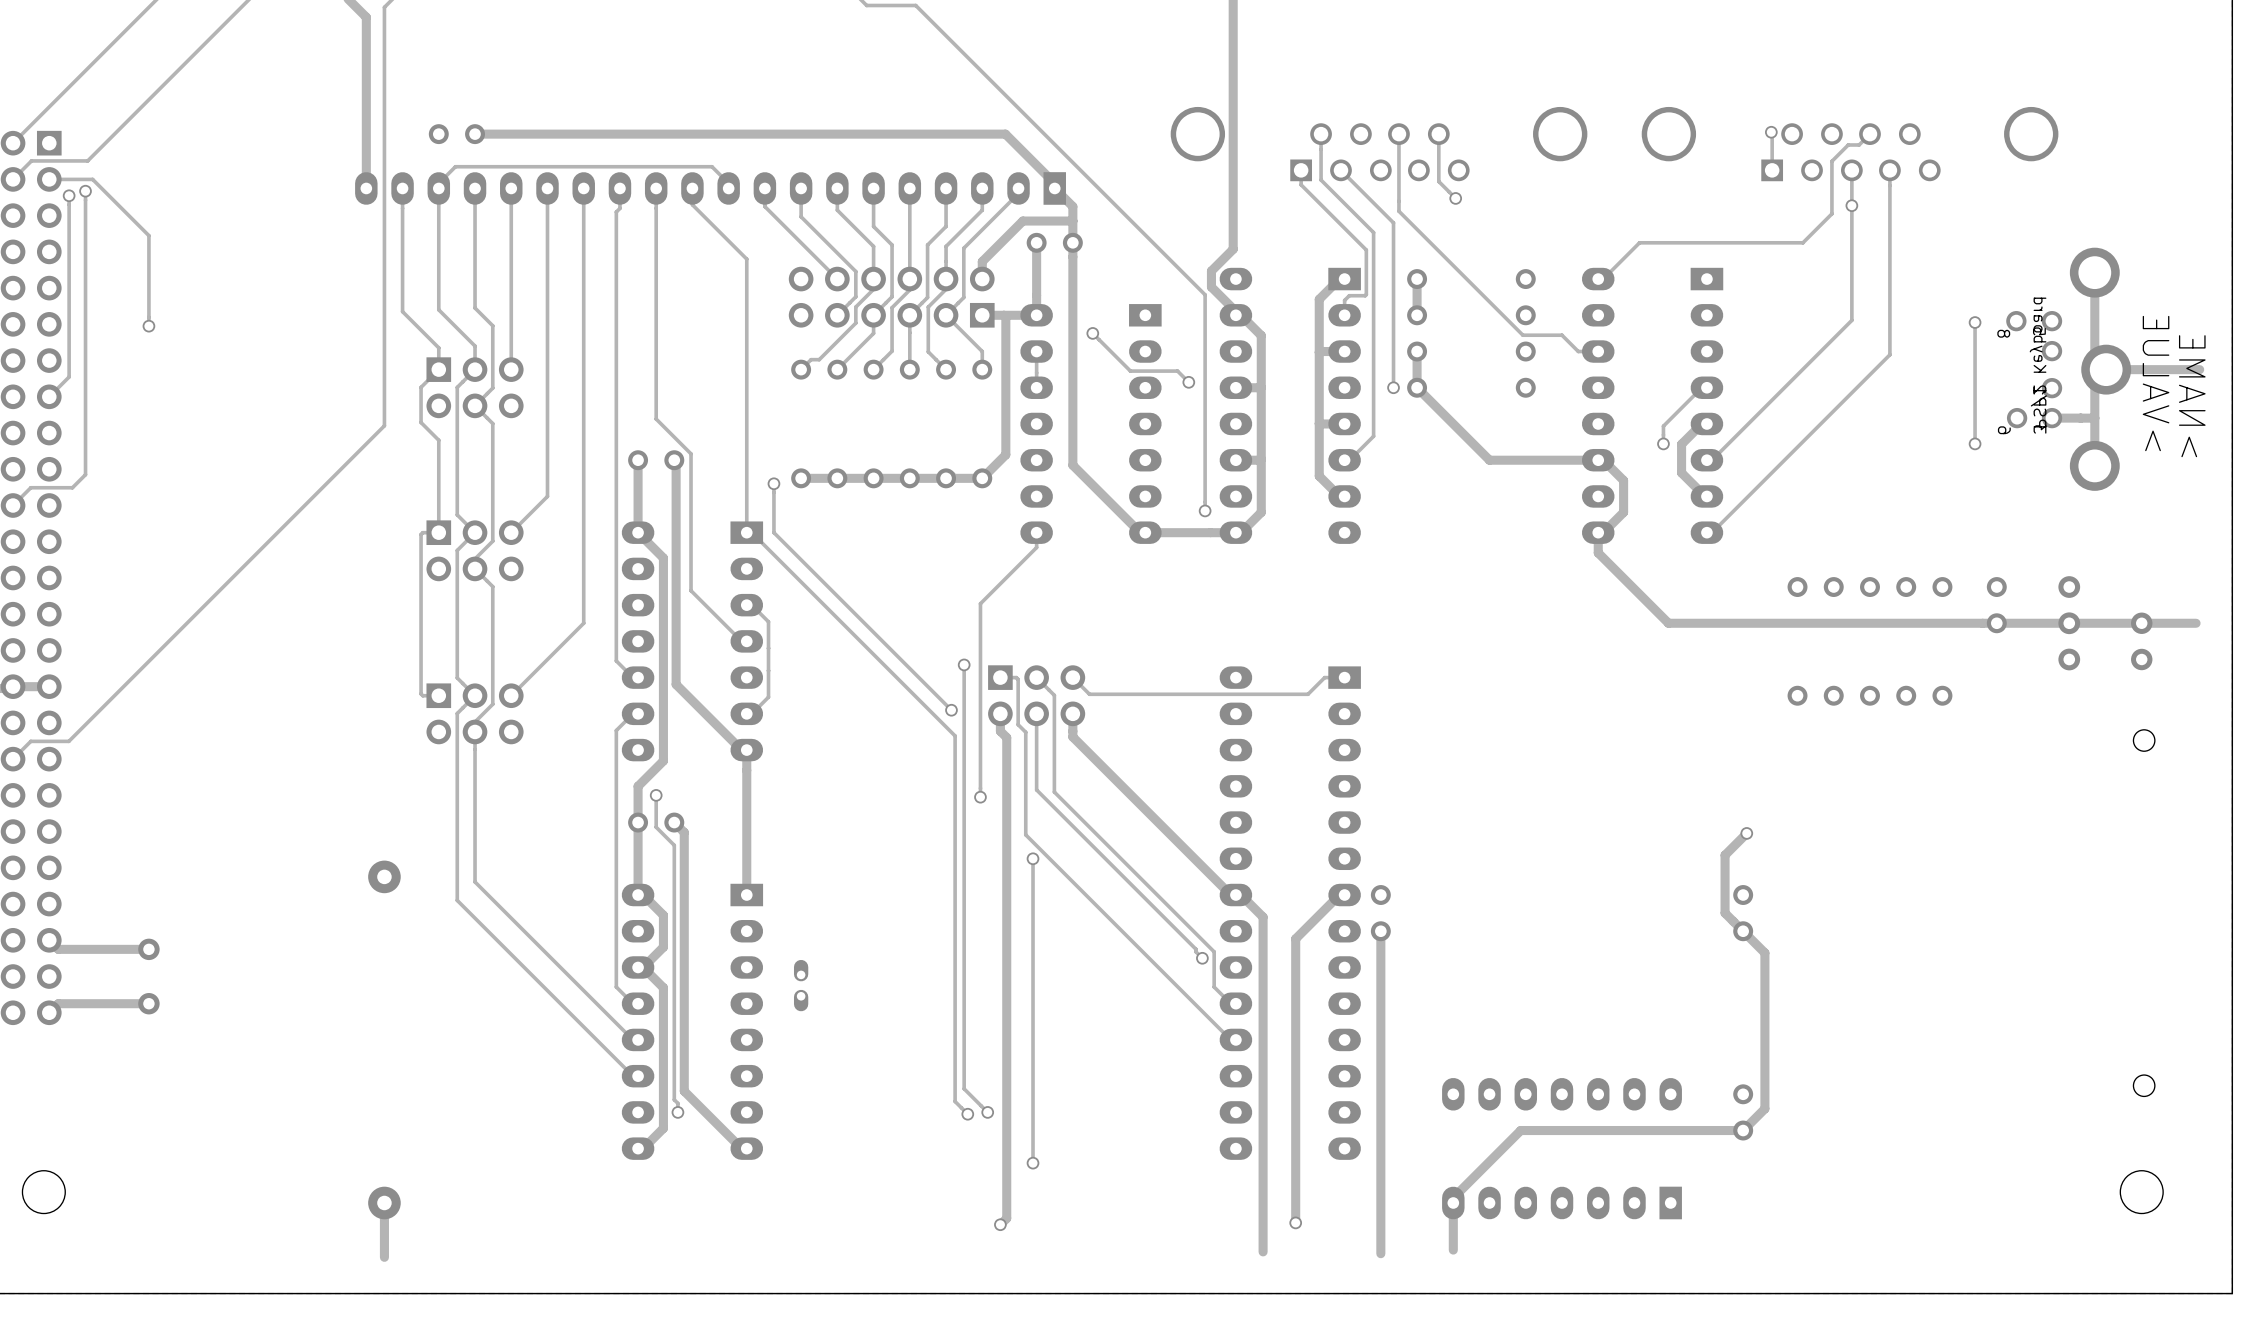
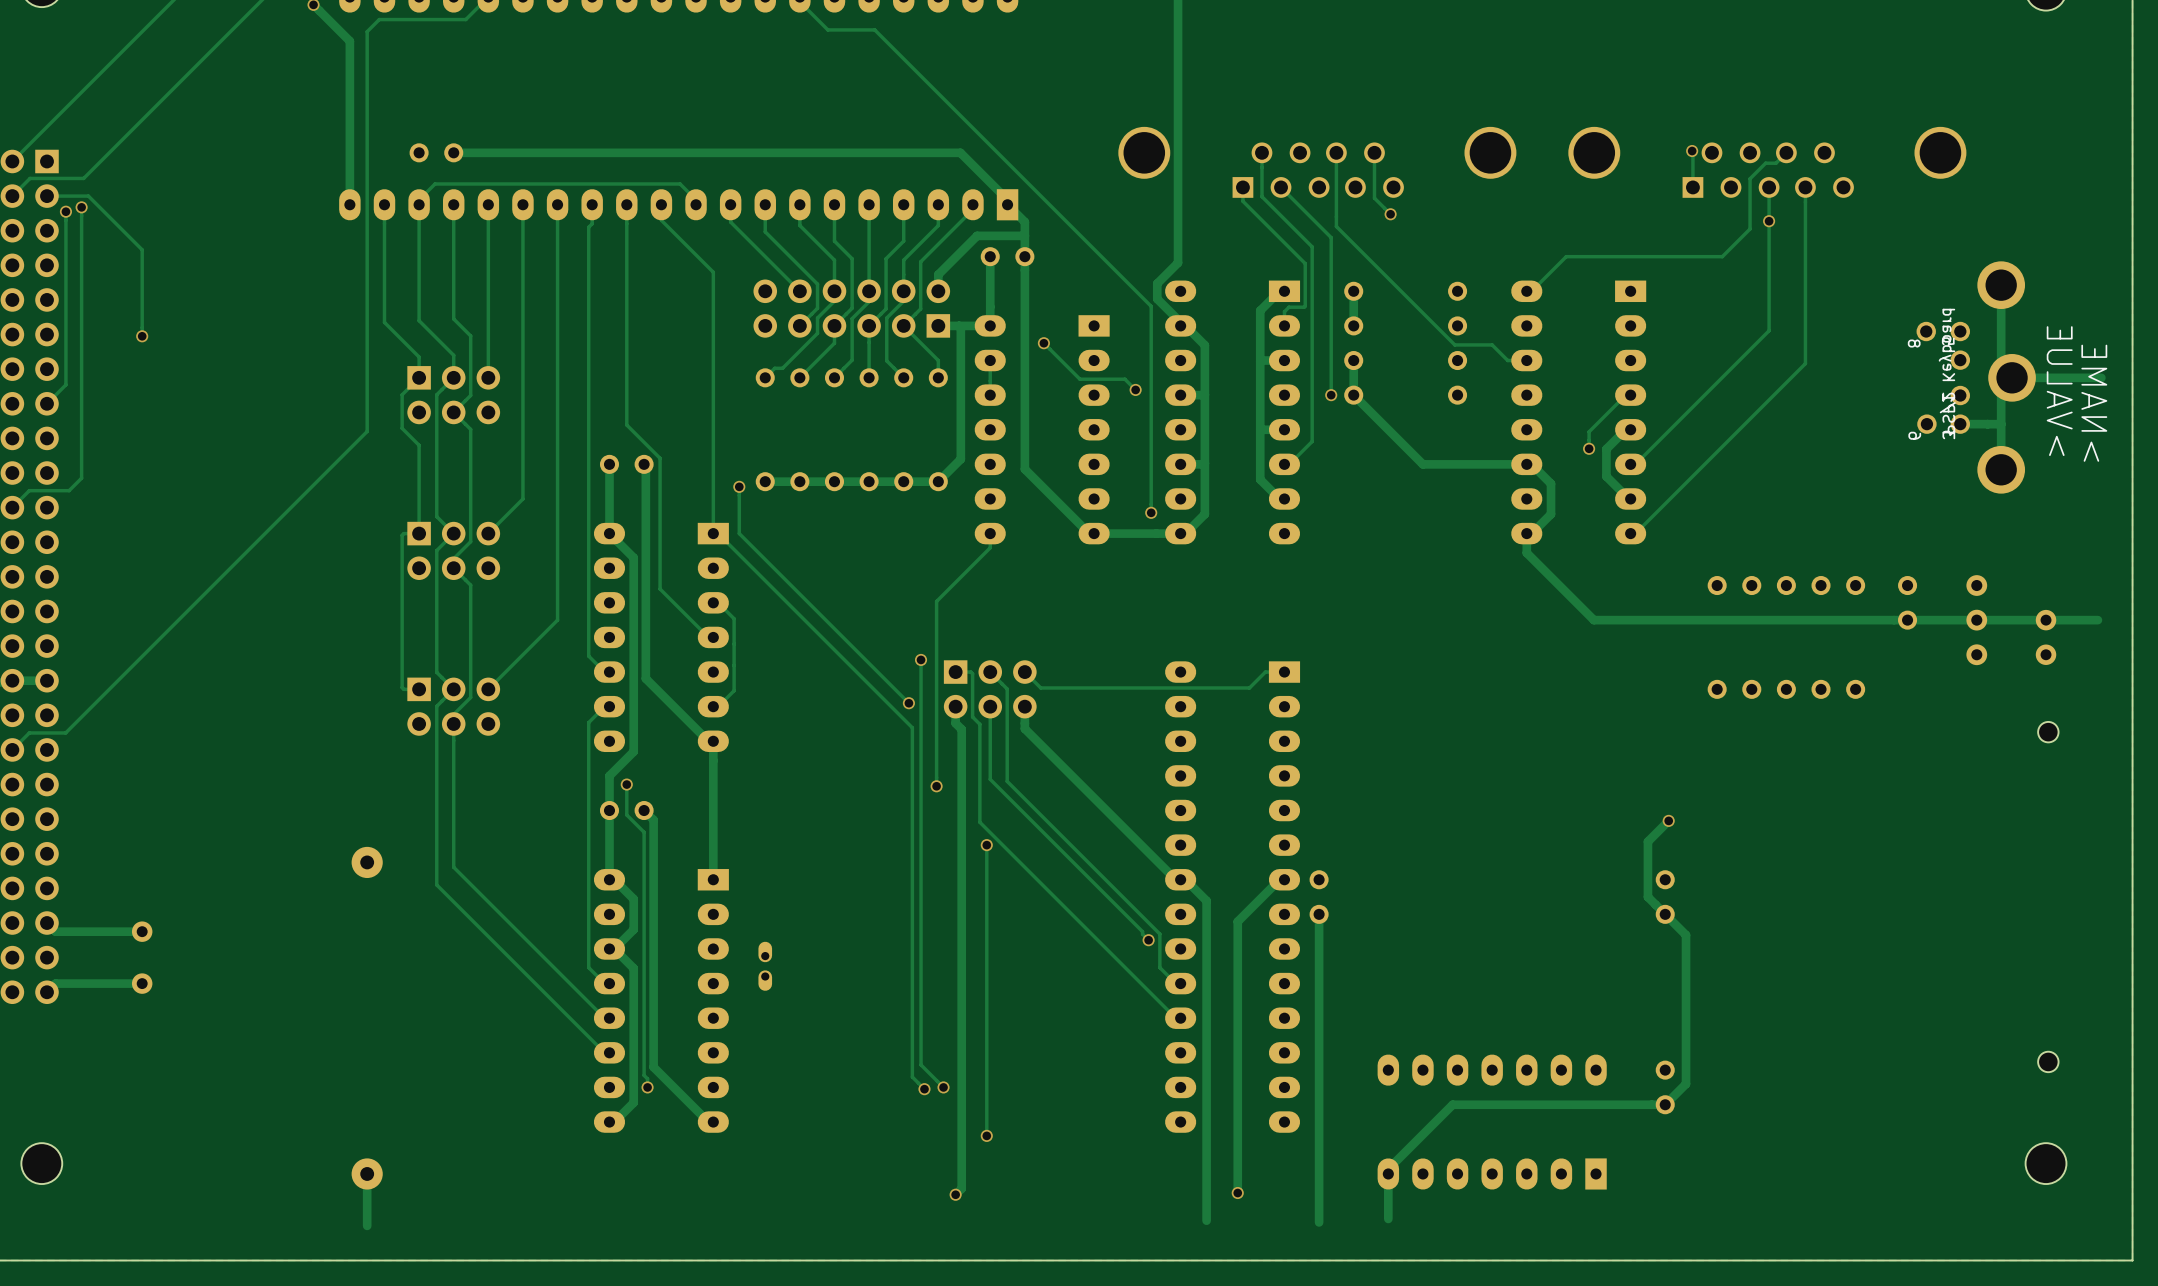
track: (1975, 322) (1975, 443) -> none
via: (1975, 322) -> none
via: (1975, 443) -> none

